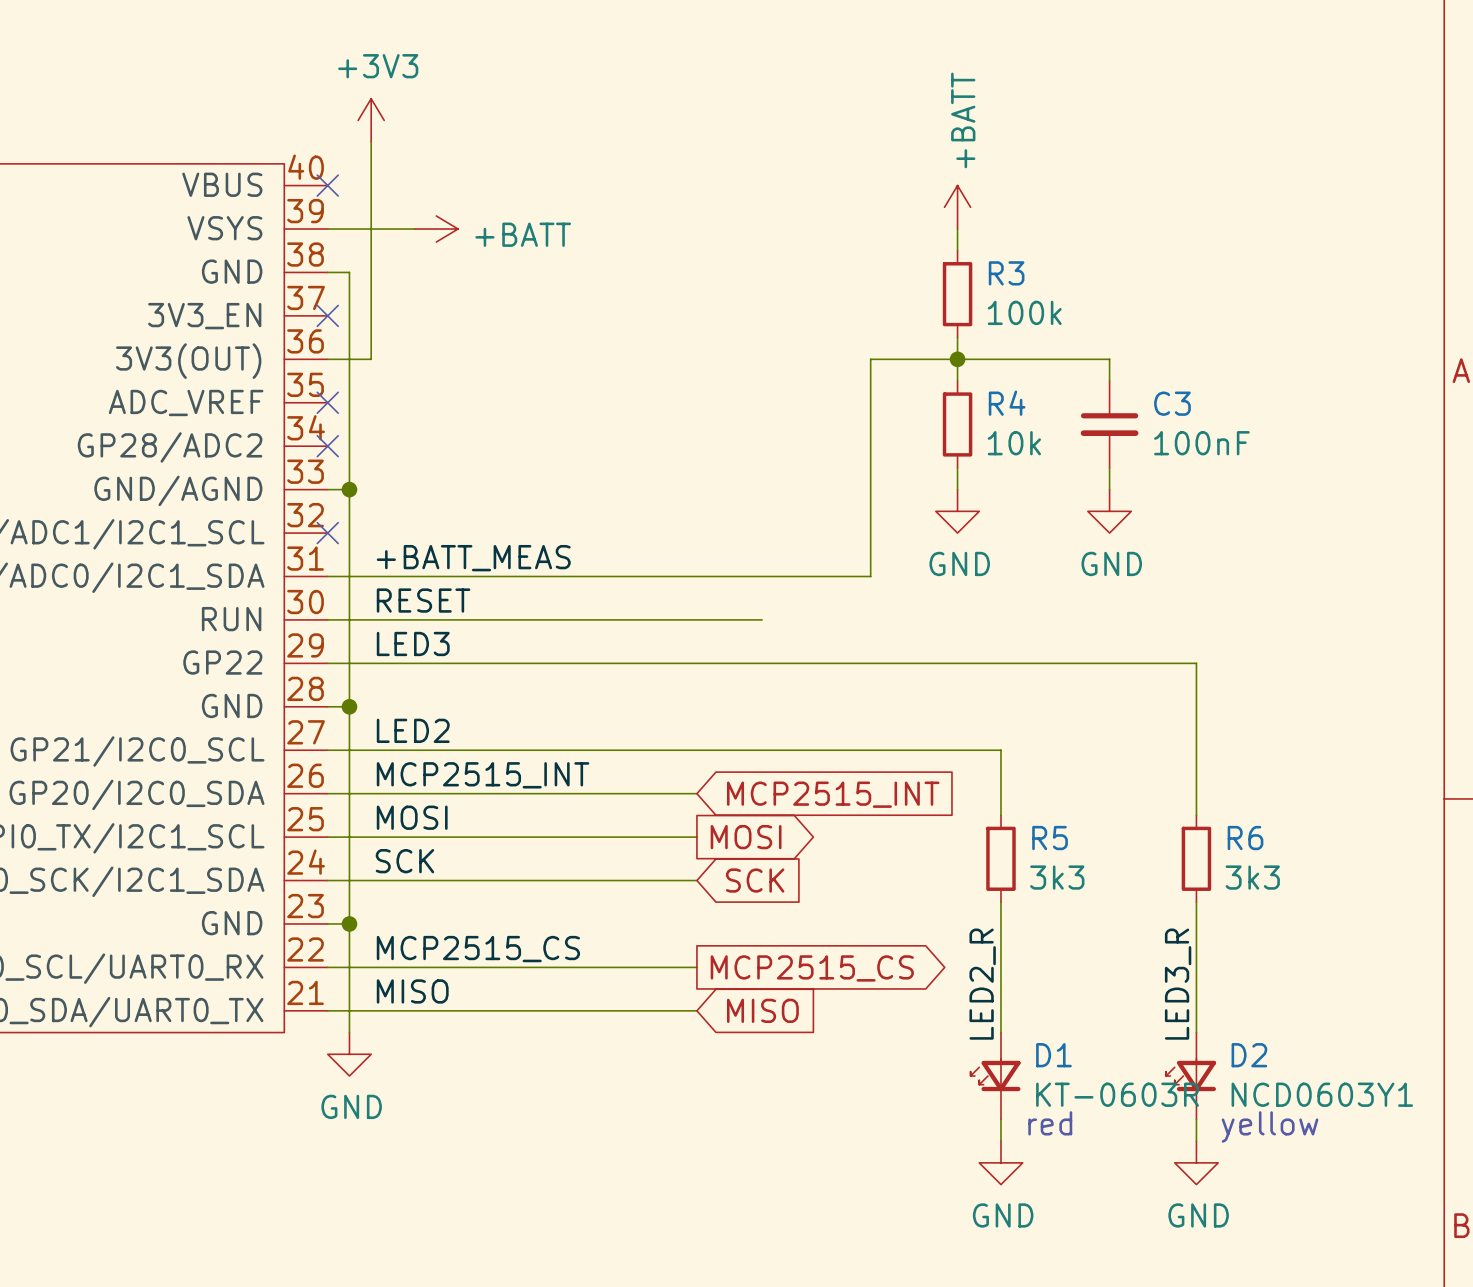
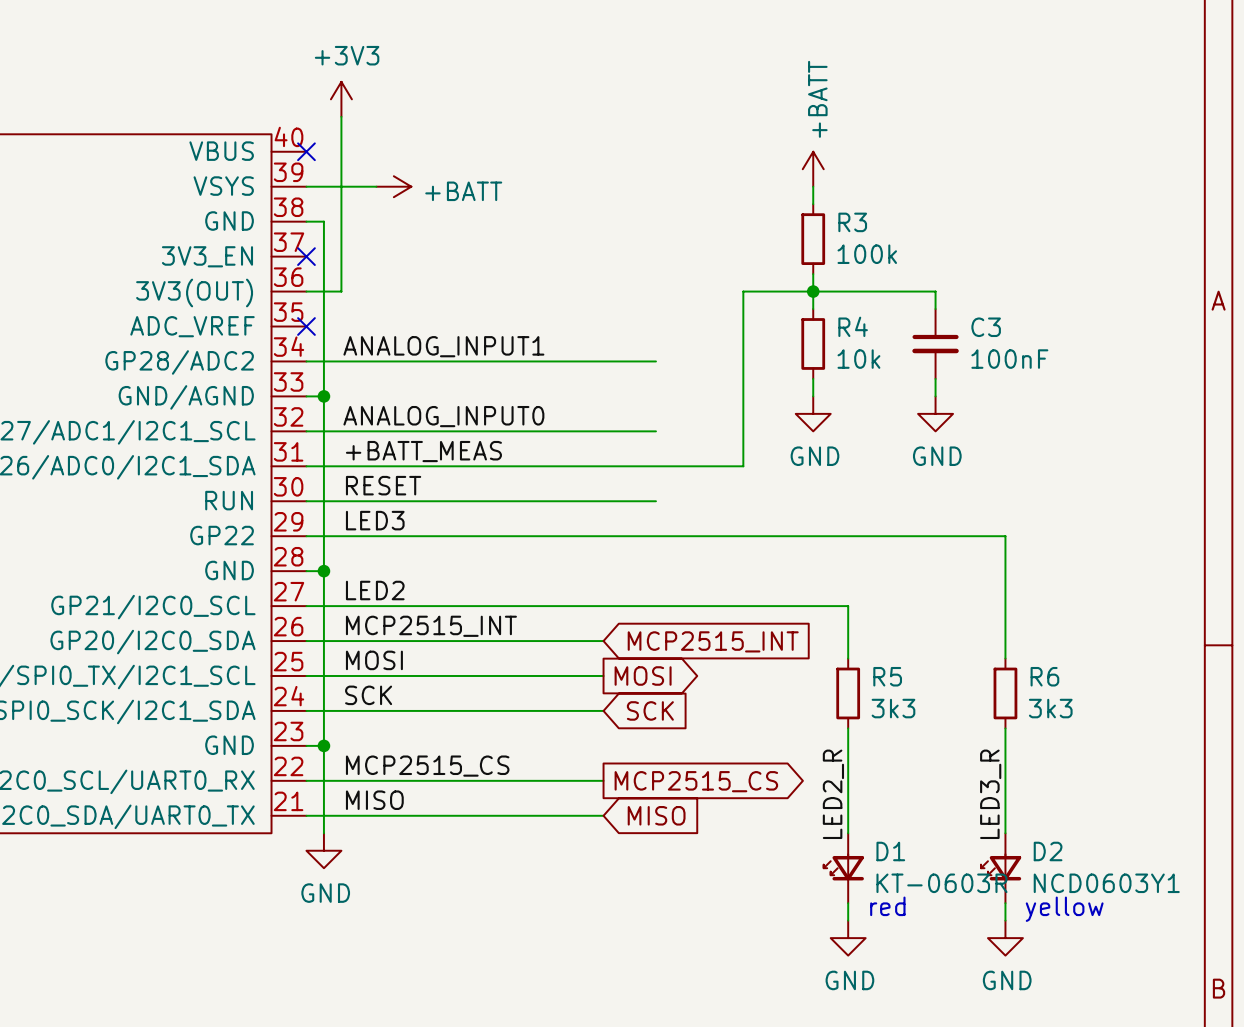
label: none -> ANALOG_INPUT1 (443, 346)
wire: none -> (306, 361) (655, 361)
no-connect mark: (327, 446) -> none
label: none -> ANALOG_INPUT0 (443, 416)
wire: none -> (306, 431) (655, 431)
no-connect mark: (327, 533) -> none

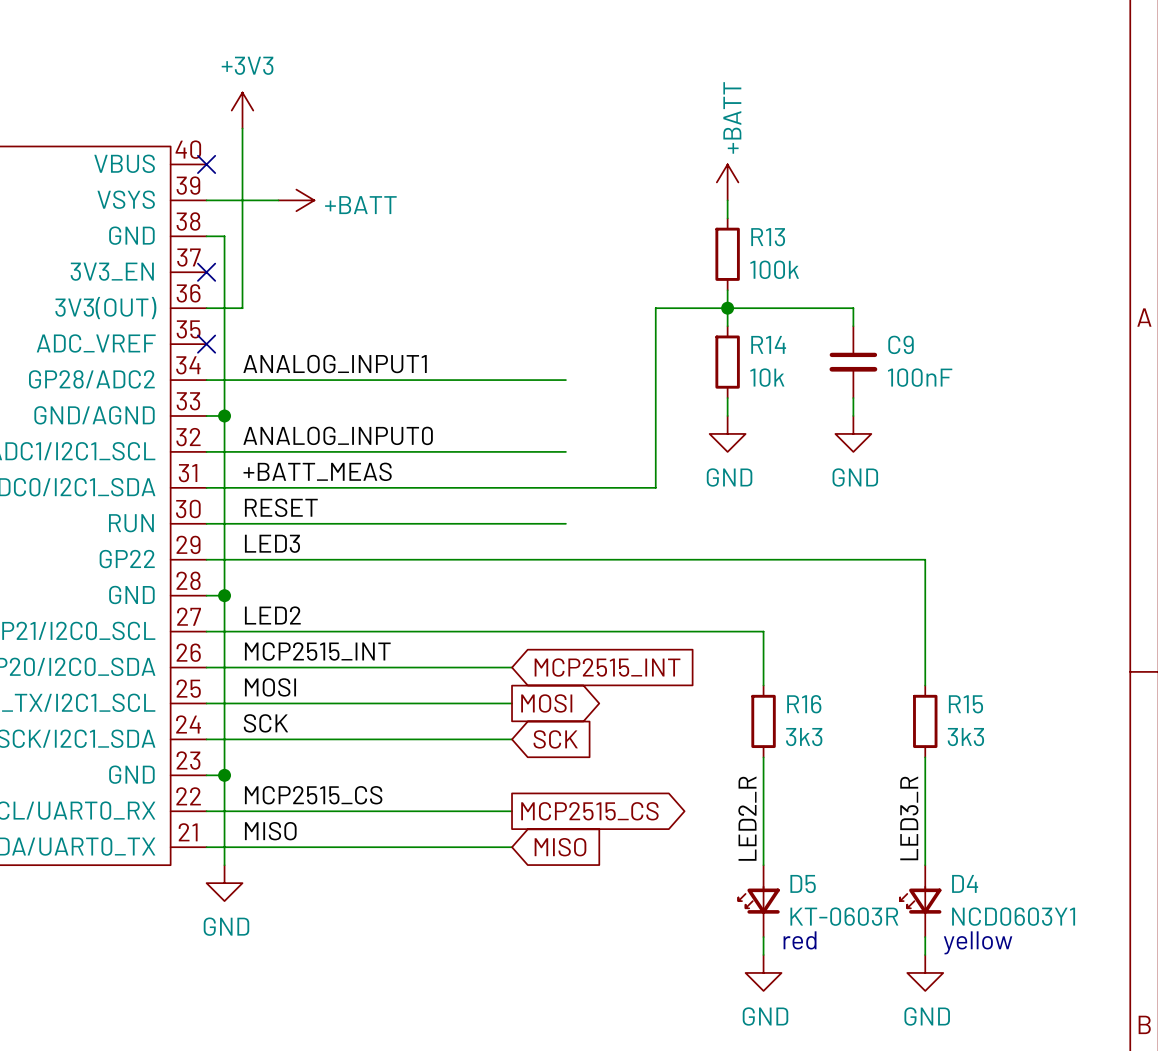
R3 name: R3 (852, 222) -> R13 (768, 237)
R4 name: R4 (853, 326) -> R14 (768, 344)
C3 name: C3 (986, 327) -> C9 (901, 344)
R5 name: R5 (887, 676) -> R16 (804, 704)
R6 name: R6 (1044, 676) -> R15 (965, 704)
D1 name: D1 (890, 851) -> D5 (803, 883)
D2 name: D2 (1048, 851) -> D4 (965, 883)

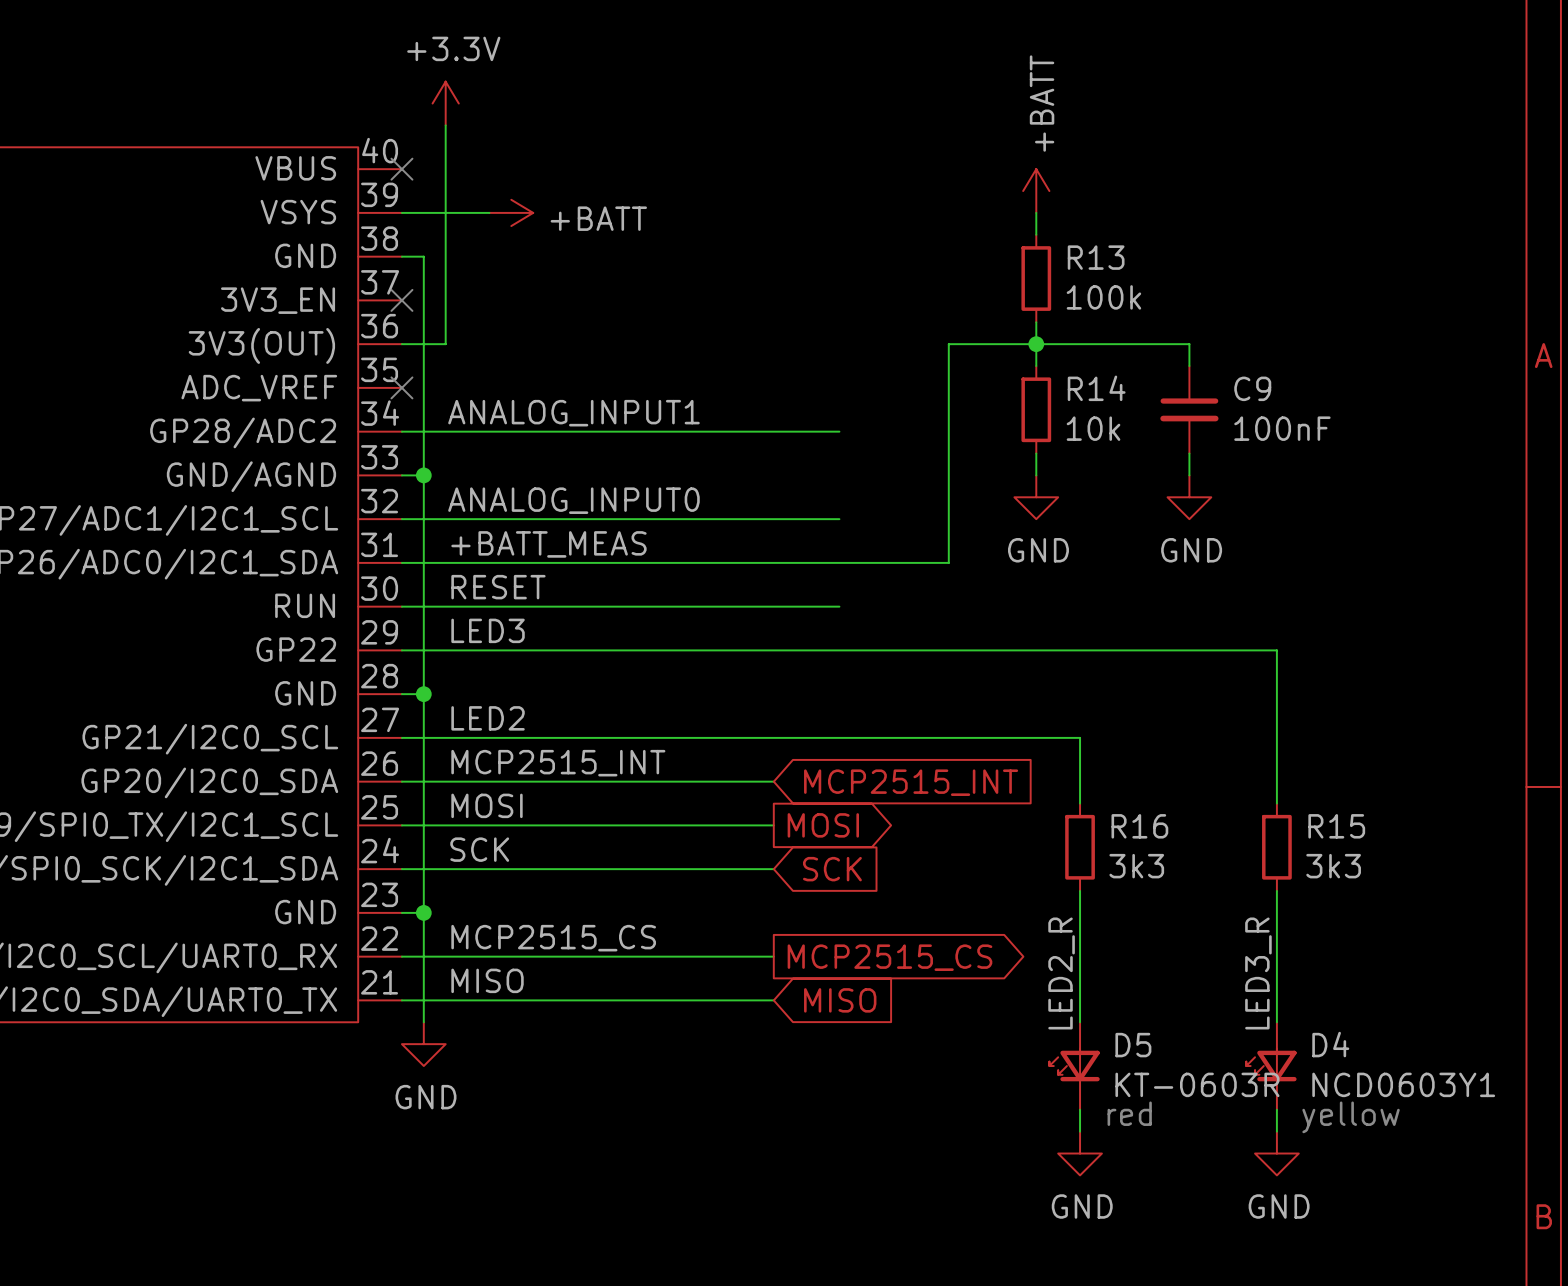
power symbol: +3V3 (242, 110) -> +3.3V (445, 103)

